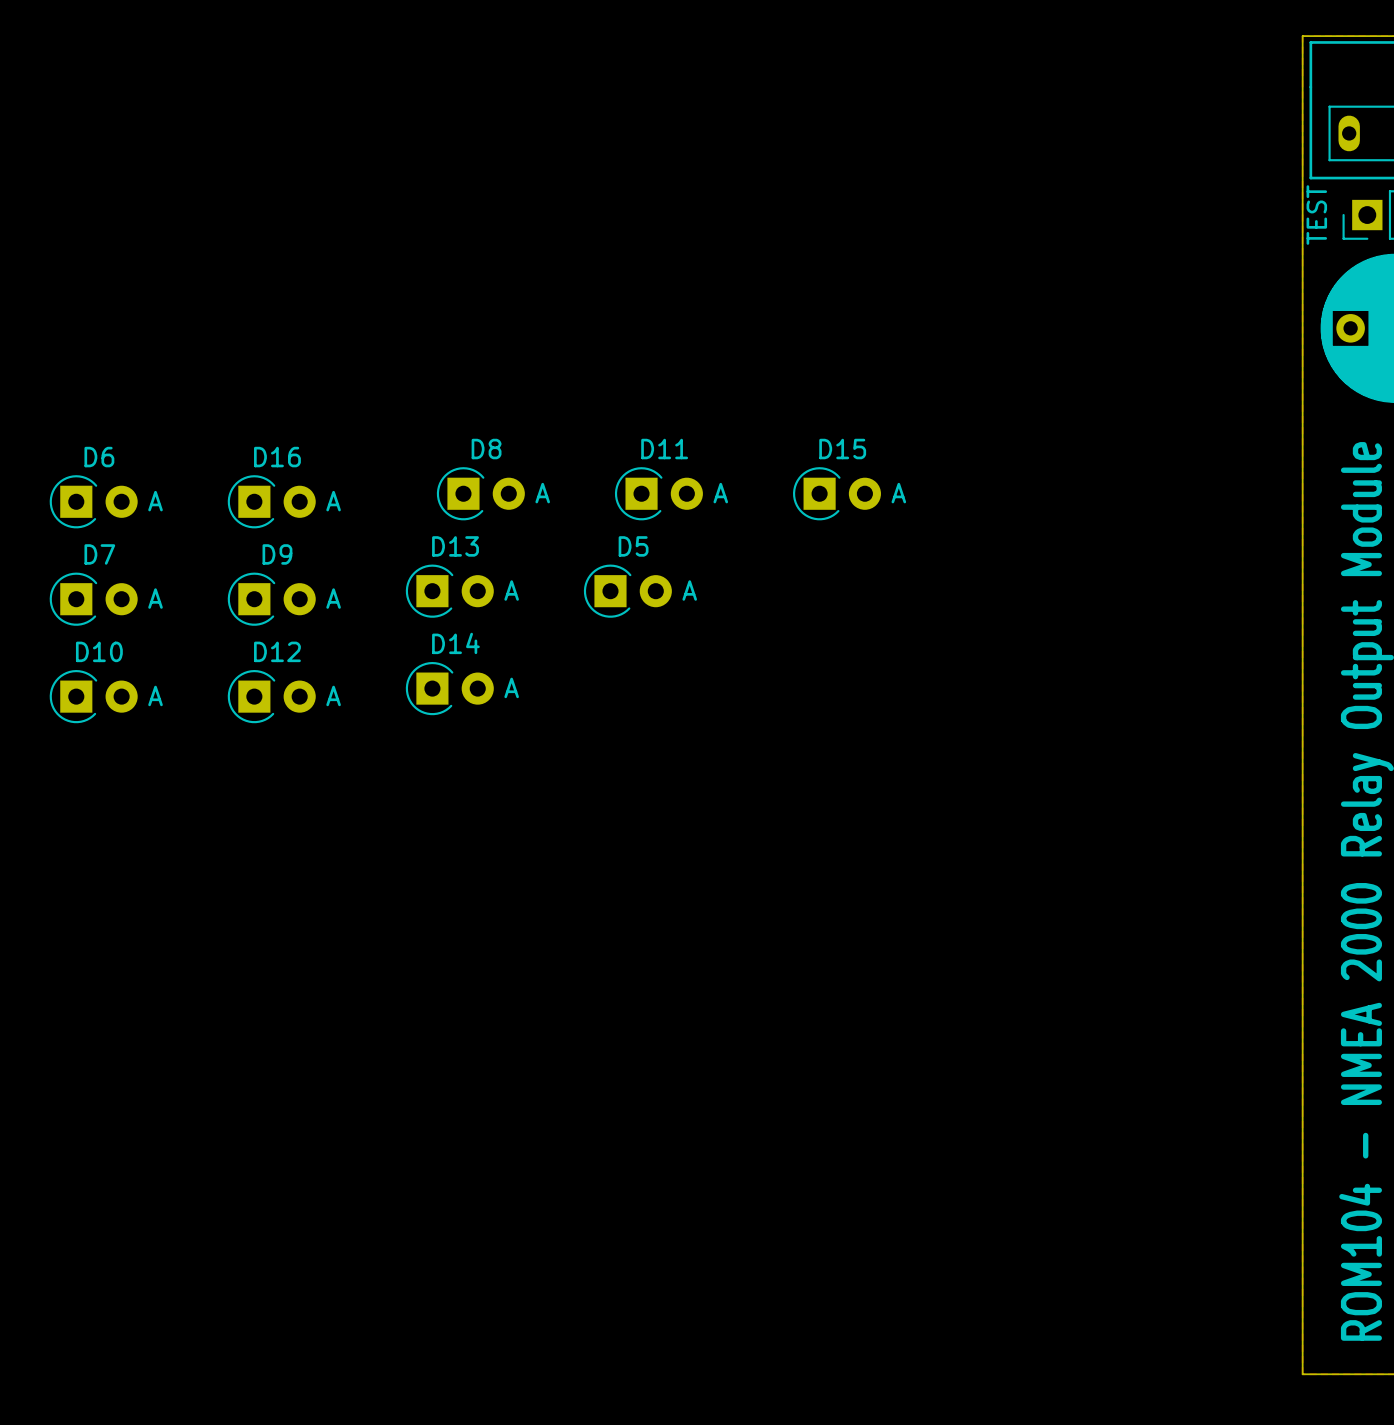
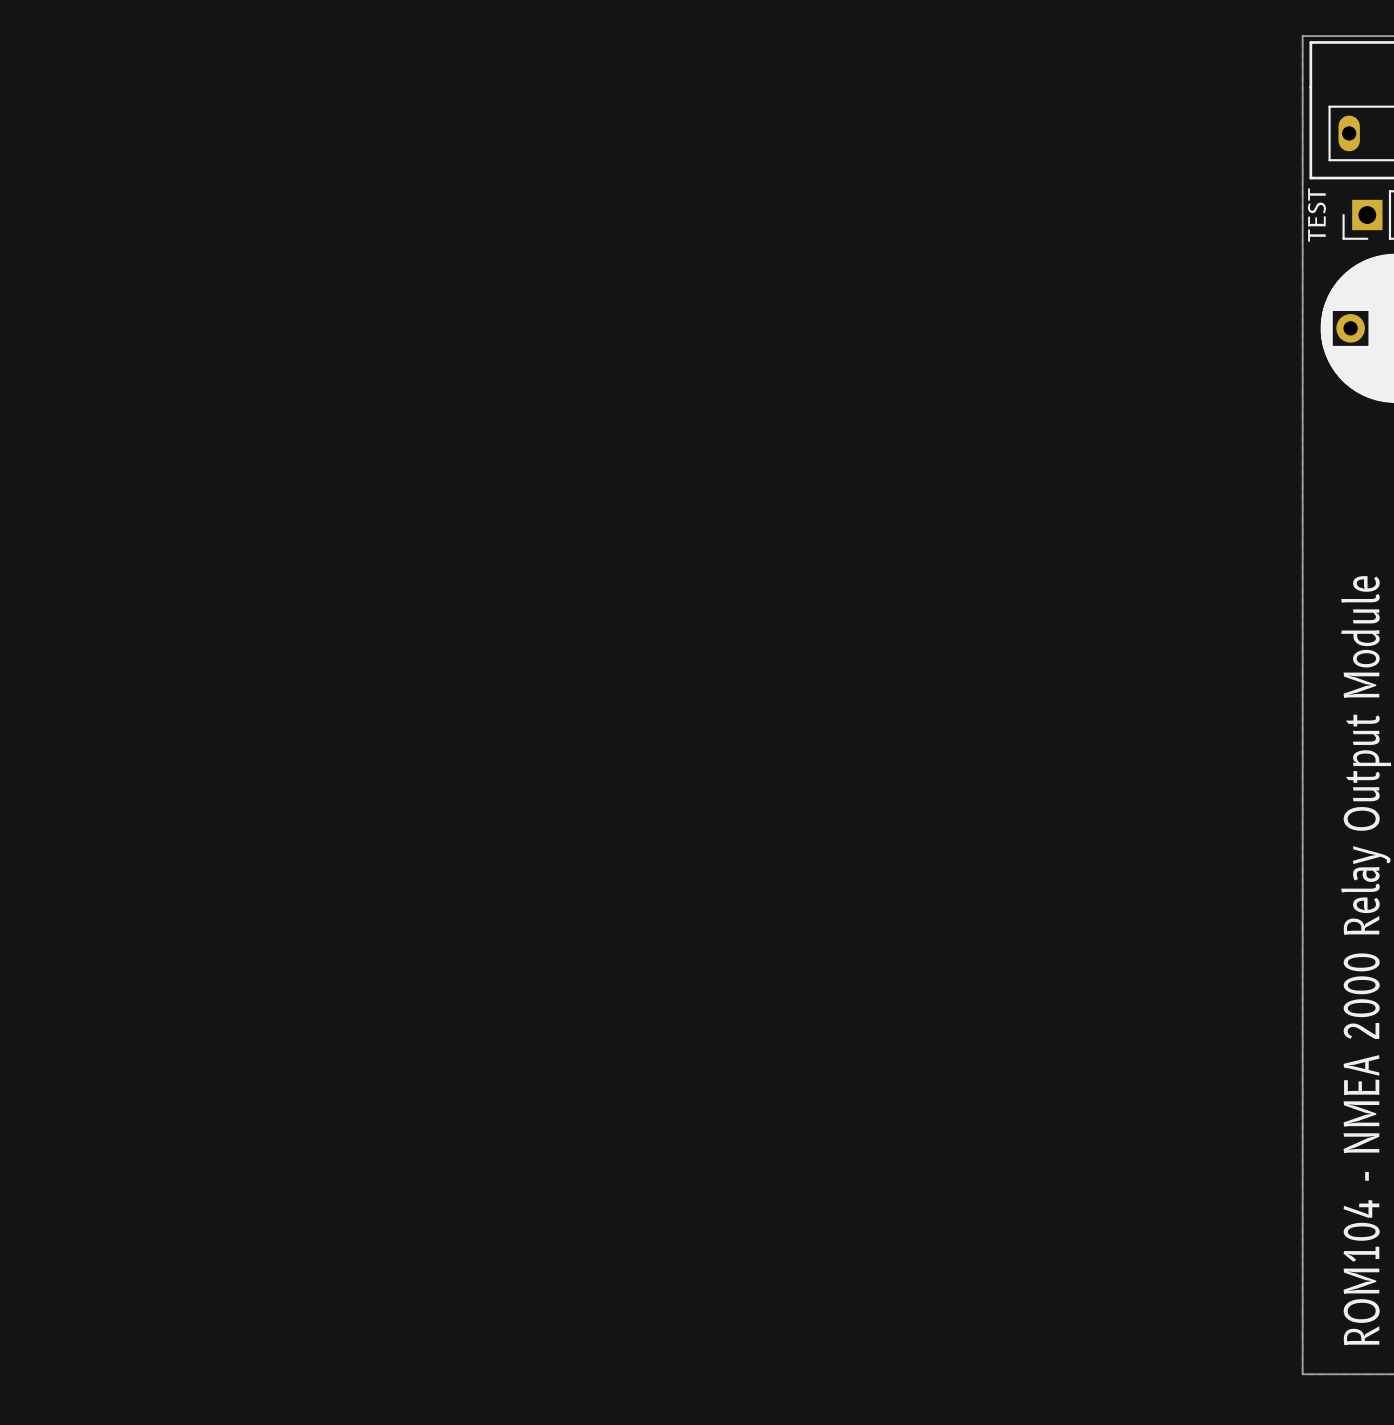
D8: (480, 493) -> none
D11: (658, 493) -> none
D15: (836, 493) -> none
D6: (93, 501) -> none
D16: (271, 501) -> none
D13: (449, 591) -> none
D5: (627, 591) -> none
D7: (93, 599) -> none
D9: (271, 599) -> none
D14: (449, 688) -> none
D10: (93, 696) -> none
D12: (271, 696) -> none

